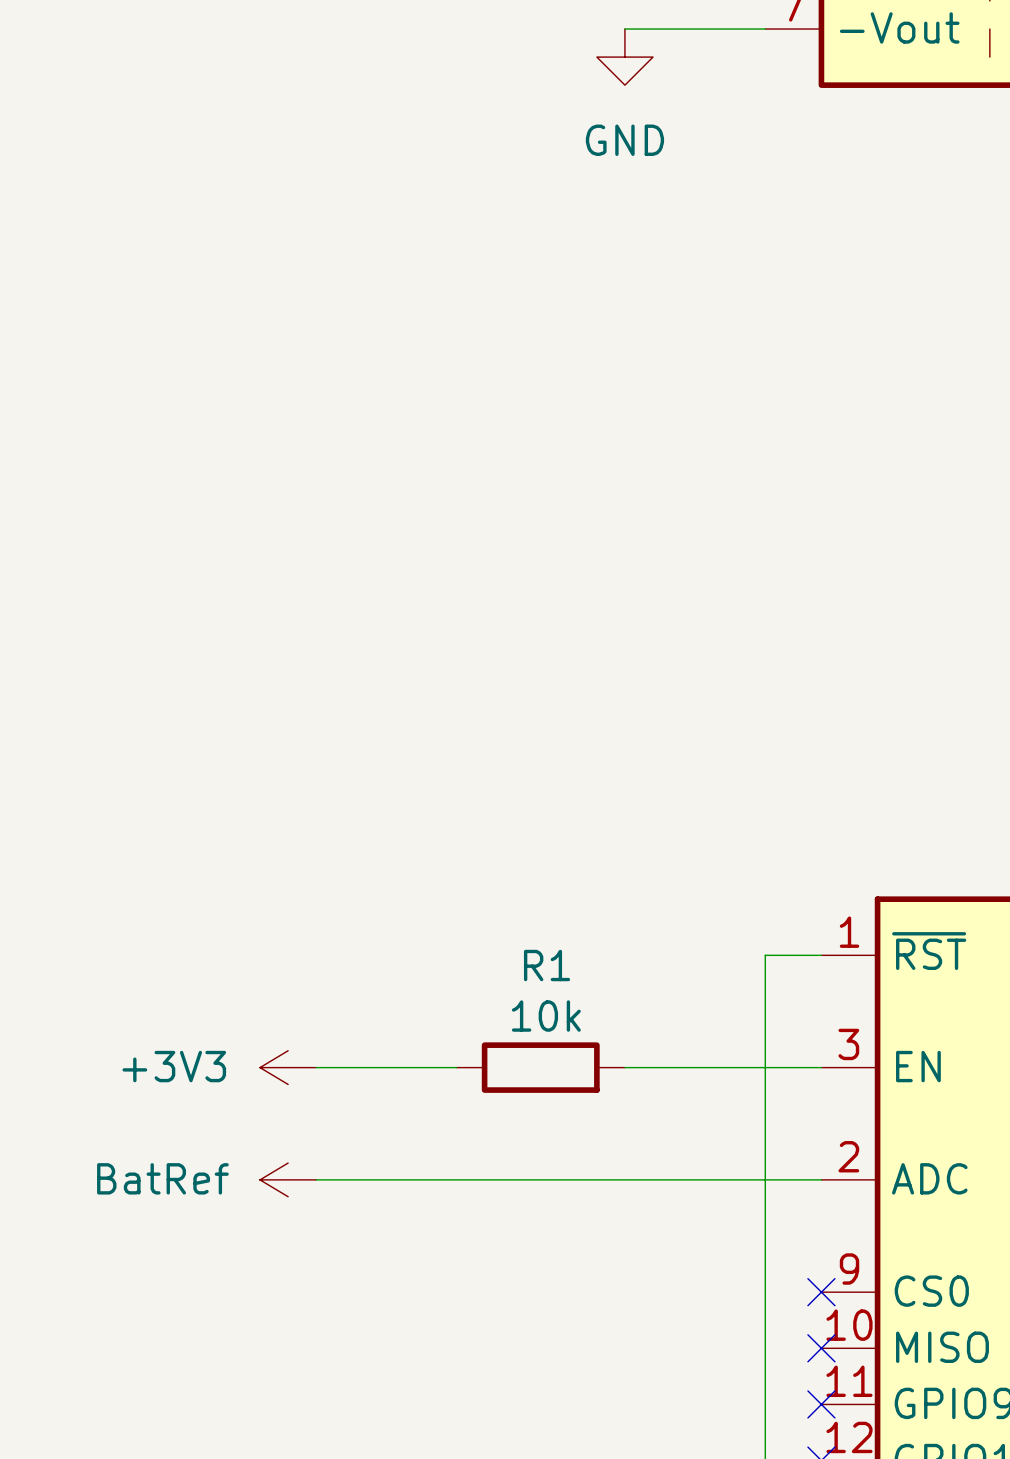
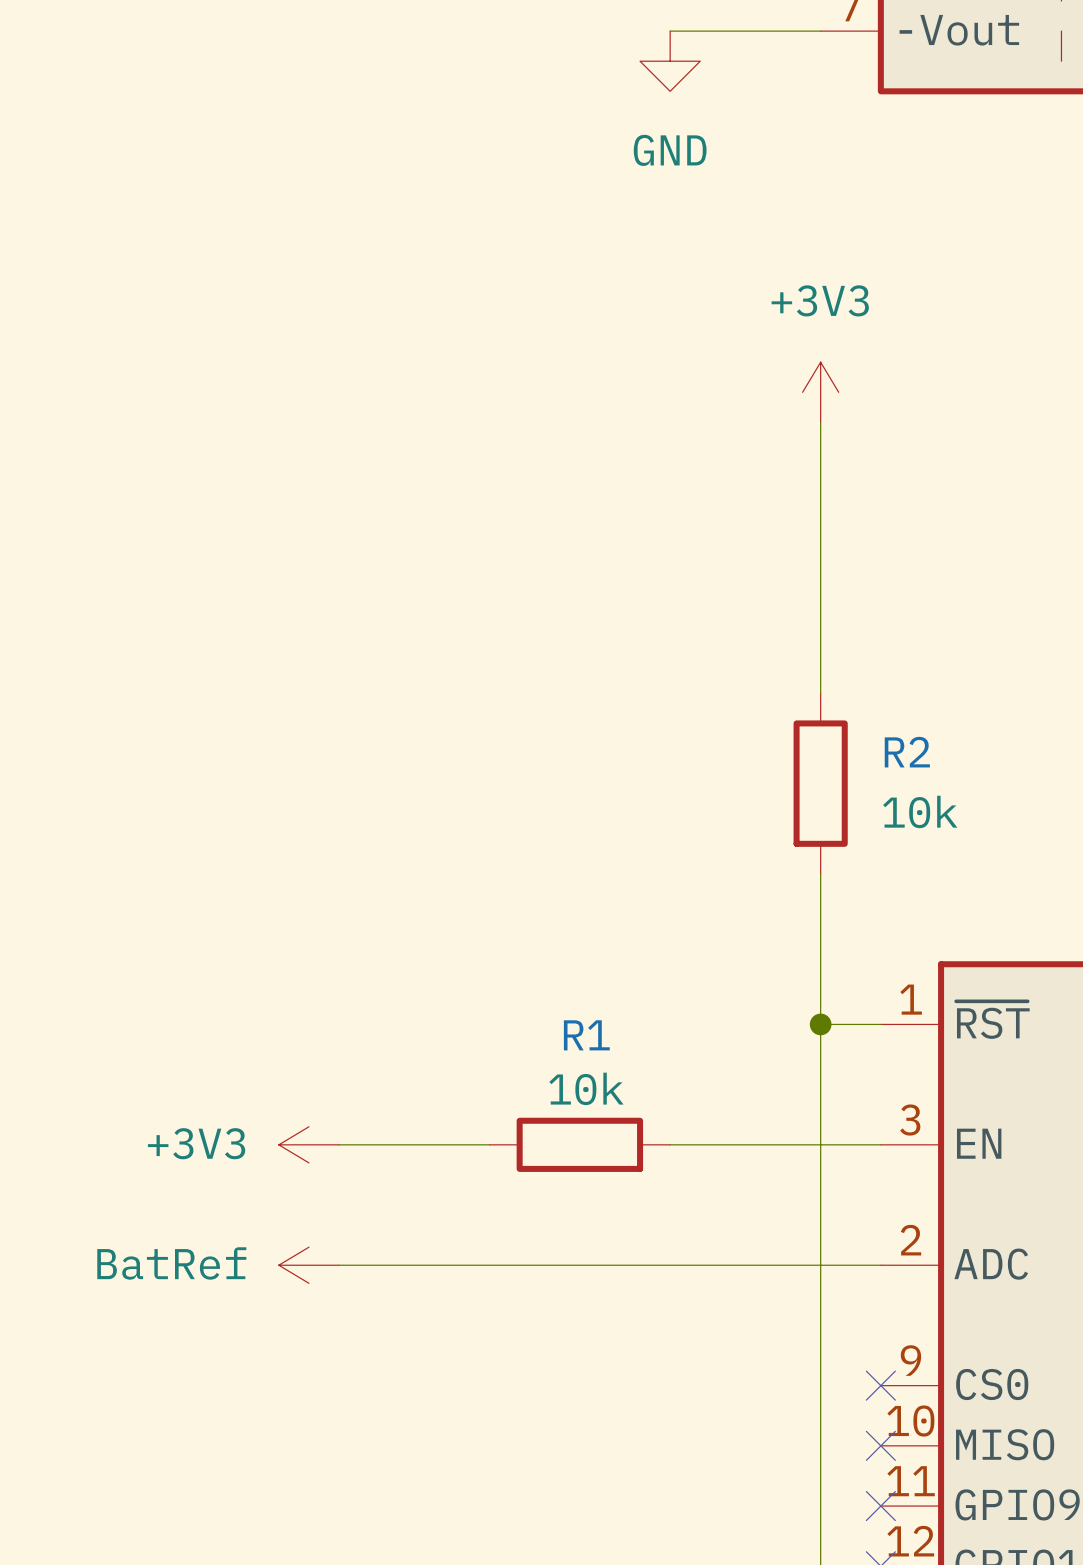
power symbol: none -> +3V3 (820, 392)
wire: none -> (820, 422) (820, 693)
R2: none -> 10k (820, 783)
wire: none -> (820, 873) (820, 1024)
junction: none -> (820, 1024)

